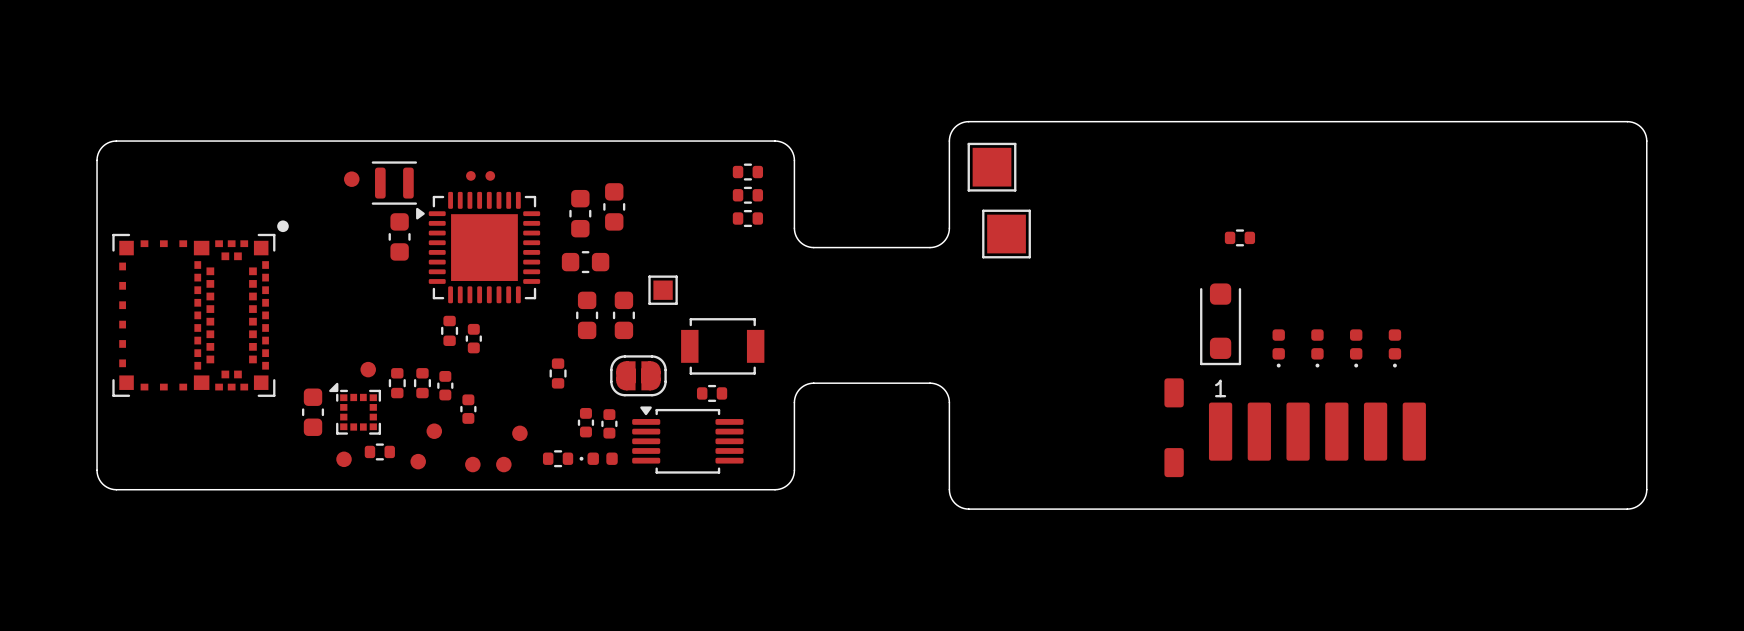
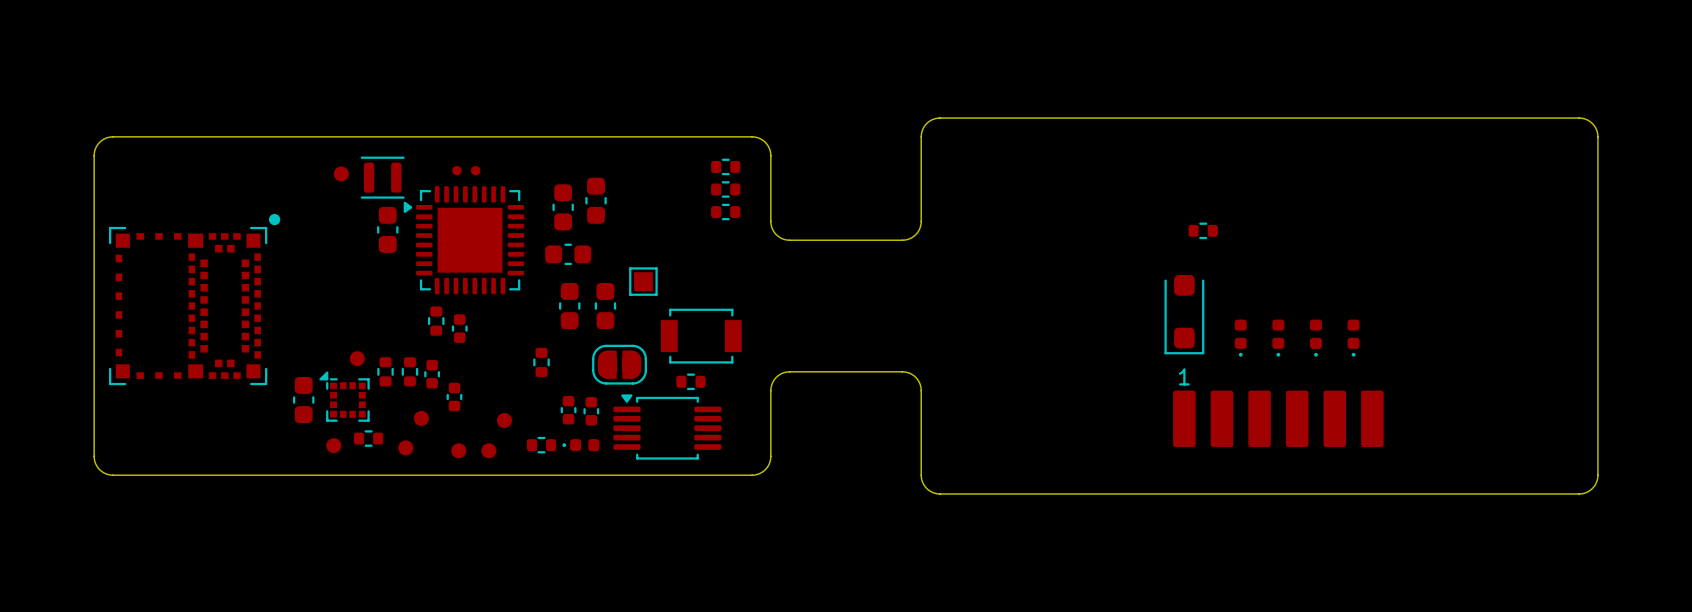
part: (992, 167) -> none
part: (1006, 234) -> none
part: (1174, 392) -> none
part: (1174, 462) -> none

